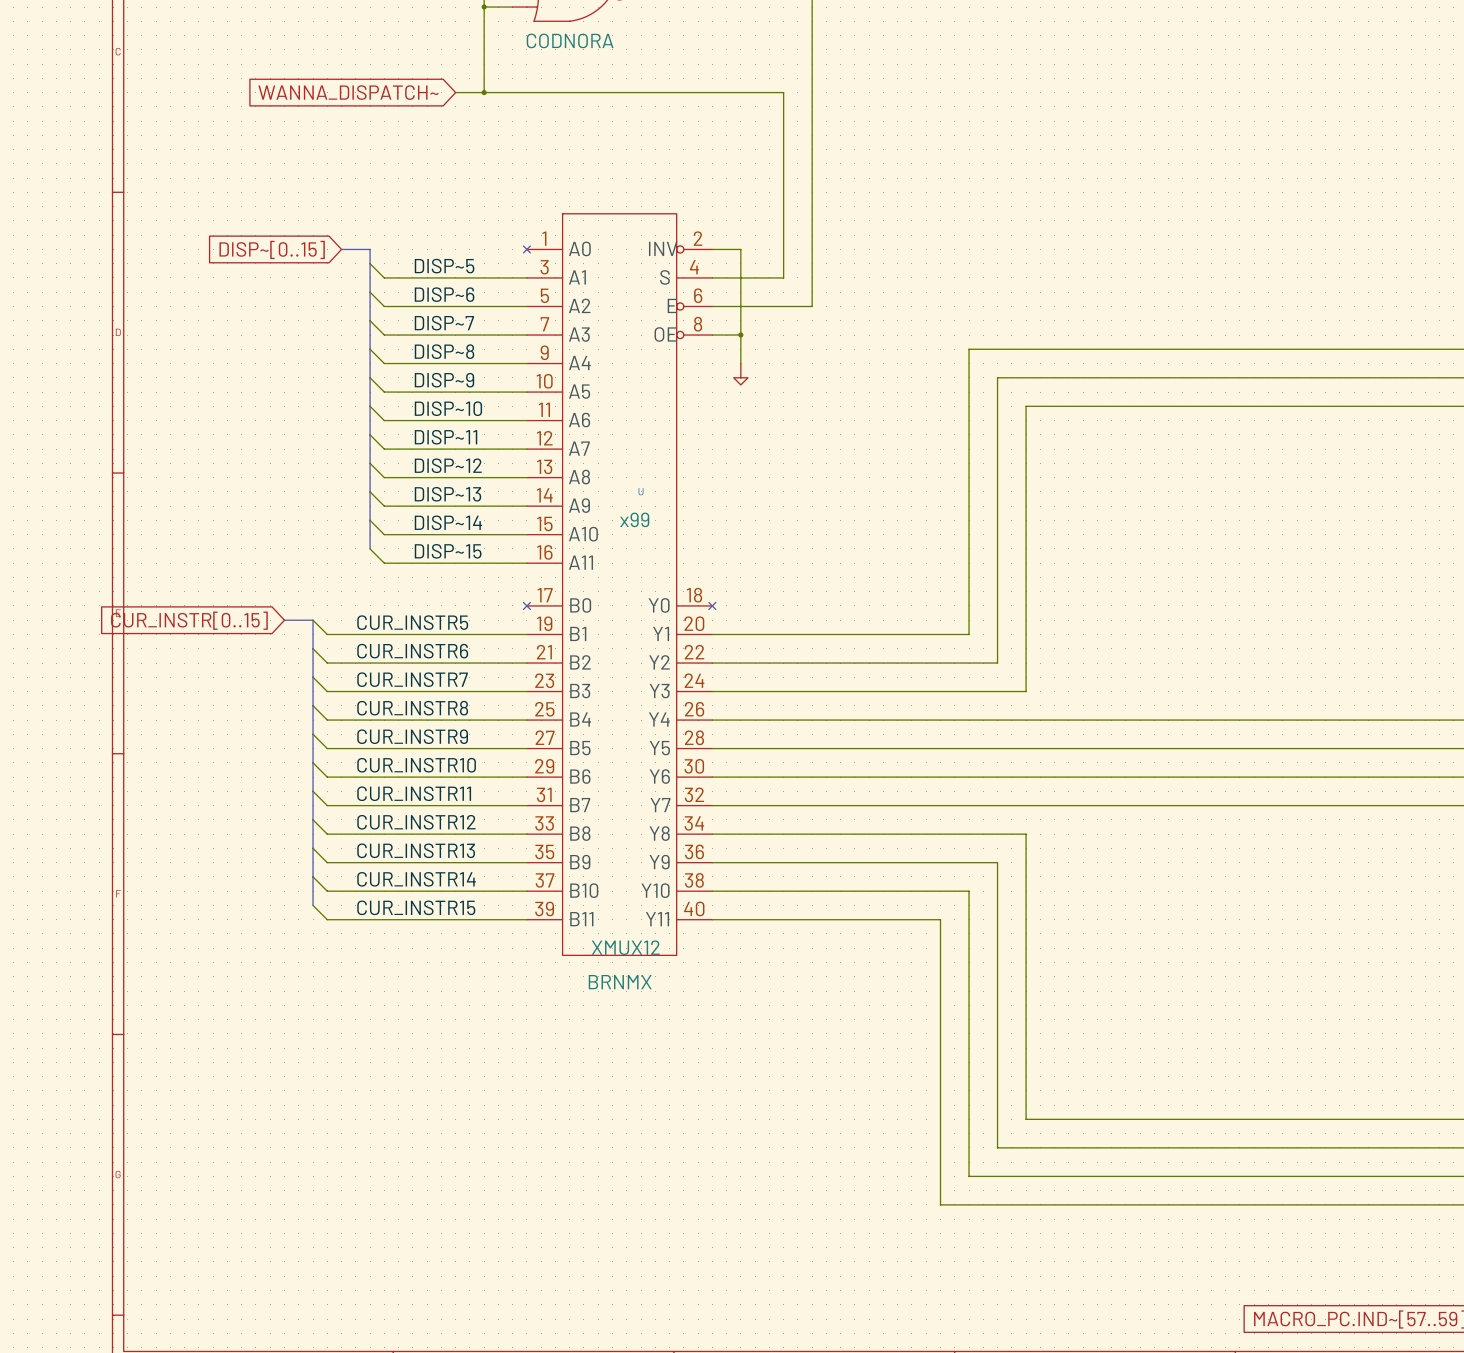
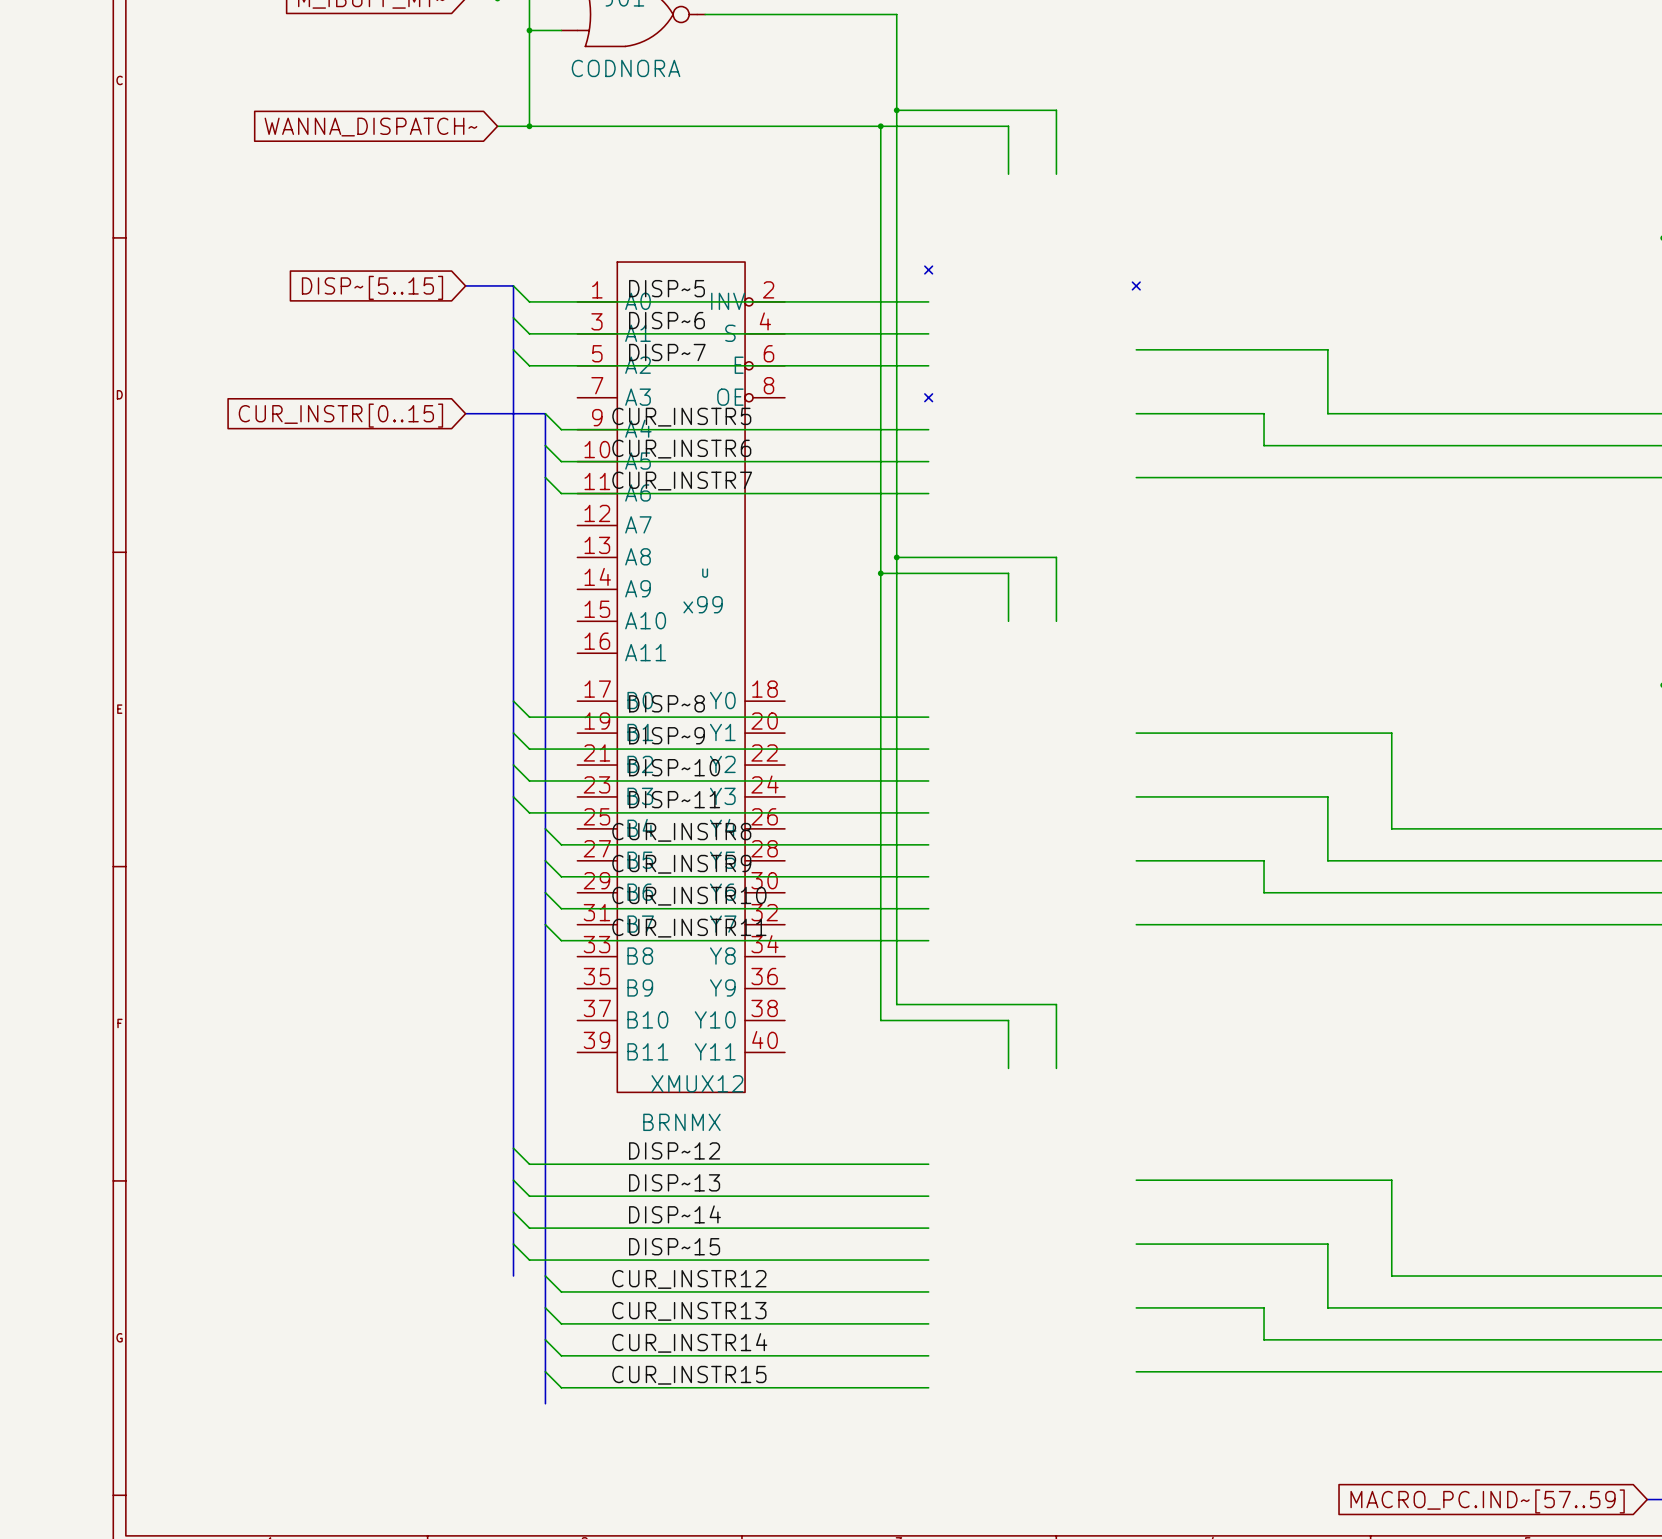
wire: none -> (896, 110) (1056, 110) (1056, 174)
junction: none -> (896, 110)
wire: (783, 92) (783, 277) -> (864, 126) (1008, 126) (1008, 174)
junction: none -> (880, 126)
no-connect mark: none -> (928, 270)
bus: none -> (465, 285) (513, 285) (513, 1276)
wire: none -> (513, 285) (529, 301) (784, 301)
no-connect mark: none -> (1136, 285)
label: none -> DISP~5 (666, 288)
global label: DISP~[0..15] (272, 249) -> DISP~[5..15] (372, 287)
bus: (341, 249) (370, 249) (370, 548) -> none
no-connect mark: (526, 249) -> none
wire: (740, 249) (740, 363) -> (816, 301) (928, 301)
wire: (370, 263) (384, 277) (484, 277) -> (513, 317) (529, 333)
label: DISP~5 (444, 266) -> none
label: none -> DISP~6 (666, 320)
wire: none -> (577, 333) (784, 333)
wire: none -> (864, 333) (928, 333)
wire: (370, 292) (384, 306) (484, 306) -> (513, 349) (529, 365)
wire: none -> (1136, 349) (1327, 349) (1327, 413)
label: DISP~6 (444, 294) -> none
label: none -> DISP~7 (667, 352)
wire: none -> (577, 365) (784, 365)
wire: none -> (928, 365) (896, 365) (896, 1004) (1056, 1004) (1056, 1068)
wire: (370, 320) (384, 335) (526, 335) -> none
label: DISP~7 (444, 323) -> none
wire: (712, 335) (740, 335) -> none
junction: (740, 335) -> none
no-connect mark: none -> (928, 397)
global label: none -> CUR_INSTR[0..15] (340, 415)
wire: (370, 349) (384, 363) (512, 363) -> (545, 413) (561, 429)
bus: none -> (465, 413) (545, 413) (545, 1403)
wire: (1026, 349) (969, 349) (969, 634) (712, 634) -> none
wire: (1140, 349) (1197, 349) -> (1264, 413) (1264, 445)
label: DISP~8 (444, 351) -> none
label: none -> CUR_INSTR5 (681, 417)
wire: none -> (577, 429) (928, 429)
power symbol: (740, 374) -> none
wire: (370, 377) (384, 392) (512, 392) -> (545, 445) (561, 461)
wire: (1140, 377) (997, 377) (997, 663) (712, 663) -> none
label: DISP~9 (444, 380) -> none
label: none -> CUR_INSTR6 (681, 449)
wire: none -> (577, 461) (928, 461)
wire: (370, 406) (384, 420) (512, 420) -> (545, 477) (561, 493)
wire: (1026, 406) (1026, 691) (712, 691) -> none
label: DISP~10 (448, 408) -> none
label: none -> CUR_INSTR7 (682, 481)
wire: none -> (577, 493) (928, 493)
wire: (370, 434) (384, 449) (526, 449) -> none
label: DISP~11 (446, 437) -> none
wire: (370, 463) (384, 477) (526, 477) -> none
label: DISP~12 (448, 465) -> none
wire: none -> (896, 557) (1056, 557) (1056, 621)
junction: none -> (896, 557)
wire: (370, 491) (384, 506) (526, 506) -> none
wire: none -> (880, 573) (1008, 573) (1008, 621)
junction: none -> (880, 573)
label: DISP~13 (447, 494) -> none
wire: (370, 520) (384, 534) (526, 534) -> none
label: DISP~14 (448, 522) -> none
wire: (370, 548) (384, 563) (526, 563) -> none
label: DISP~15 (448, 551) -> none
wire: none -> (513, 701) (529, 717) (928, 717)
no-connect mark: (526, 605) -> none
no-connect mark: (712, 605) -> none
label: none -> DISP~8 (666, 703)
global label: CUR_INSTR[0..15] (189, 620) -> none
bus: (284, 620) (313, 620) (313, 905) -> none
wire: (313, 620) (327, 634) (526, 634) -> none
label: CUR_INSTR5 (412, 622) -> none
wire: none -> (513, 733) (529, 749) (928, 749)
label: none -> DISP~9 (666, 735)
wire: (313, 648) (327, 663) (526, 663) -> none
label: CUR_INSTR6 (412, 651) -> none
wire: none -> (513, 765) (529, 780) (928, 780)
label: none -> DISP~10 (674, 767)
wire: (313, 677) (327, 691) (526, 691) -> none
label: CUR_INSTR7 (412, 679) -> none
wire: none -> (513, 796) (529, 812) (928, 812)
wire: none -> (1136, 796) (1327, 796) (1327, 860)
label: none -> DISP~11 (674, 799)
wire: (313, 705) (327, 720) (526, 720) -> none
label: CUR_INSTR8 (412, 708) -> none
wire: none -> (545, 828) (561, 844) (928, 844)
wire: (712, 720) (1254, 720) -> (1136, 733) (1391, 733) (1391, 828)
label: none -> CUR_INSTR8 (681, 832)
wire: (313, 734) (327, 748) (526, 748) -> none
label: CUR_INSTR9 (412, 736) -> none
wire: none -> (545, 860) (561, 876) (928, 876)
wire: (712, 748) (1026, 748) -> none
wire: (1140, 748) (1197, 748) -> (1264, 860) (1264, 892)
label: none -> CUR_INSTR9 (681, 864)
wire: (313, 762) (327, 777) (526, 777) -> none
label: CUR_INSTR10 (416, 765) -> none
wire: none -> (545, 892) (561, 908) (928, 908)
wire: (712, 777) (1140, 777) -> none
label: none -> CUR_INSTR10 (689, 896)
wire: (313, 791) (327, 805) (526, 805) -> none
label: CUR_INSTR11 (414, 793) -> none
wire: none -> (545, 924) (561, 940) (928, 940)
wire: (712, 805) (1026, 805) -> none
label: none -> CUR_INSTR11 (689, 928)
wire: (313, 819) (327, 834) (526, 834) -> none
label: CUR_INSTR12 (416, 822) -> none
wire: (712, 834) (1026, 834) (1026, 1119) (1254, 1119) -> (1136, 1180) (1391, 1180) (1391, 1276)
wire: (313, 848) (327, 862) (526, 862) -> none
label: CUR_INSTR13 (416, 850) -> none
wire: (712, 862) (997, 862) (997, 1147) (1026, 1147) -> none
wire: (313, 876) (327, 891) (526, 891) -> none
label: CUR_INSTR14 (416, 879) -> none
wire: (712, 891) (797, 891) -> (880, 126) (880, 1020)
wire: (911, 891) (969, 891) (969, 1176) (1140, 1176) -> (1008, 1020) (1008, 1068)
wire: (313, 905) (327, 919) (526, 919) -> none
label: CUR_INSTR15 (416, 907) -> none
wire: (712, 919) (940, 919) (940, 1204) (1026, 1204) -> none
wire: none -> (513, 1148) (529, 1164) (928, 1164)
label: none -> DISP~12 (674, 1150)
wire: none -> (513, 1180) (529, 1196) (928, 1196)
label: none -> DISP~13 (674, 1182)
wire: none -> (513, 1212) (529, 1228) (928, 1228)
label: none -> DISP~14 (674, 1214)
wire: none -> (513, 1244) (529, 1260) (928, 1260)
wire: none -> (1136, 1244) (1327, 1244) (1327, 1307)
label: none -> DISP~15 (674, 1246)
wire: none -> (545, 1276) (561, 1291) (928, 1291)
label: none -> CUR_INSTR12 (689, 1279)
wire: none -> (545, 1307) (561, 1323) (928, 1323)
wire: (1140, 1147) (1197, 1147) -> (1264, 1307) (1264, 1339)
label: none -> CUR_INSTR13 (689, 1311)
wire: none -> (545, 1339) (561, 1355) (928, 1355)
label: none -> CUR_INSTR14 (689, 1342)
wire: none -> (545, 1371) (561, 1387) (928, 1387)
label: none -> CUR_INSTR15 (689, 1375)

